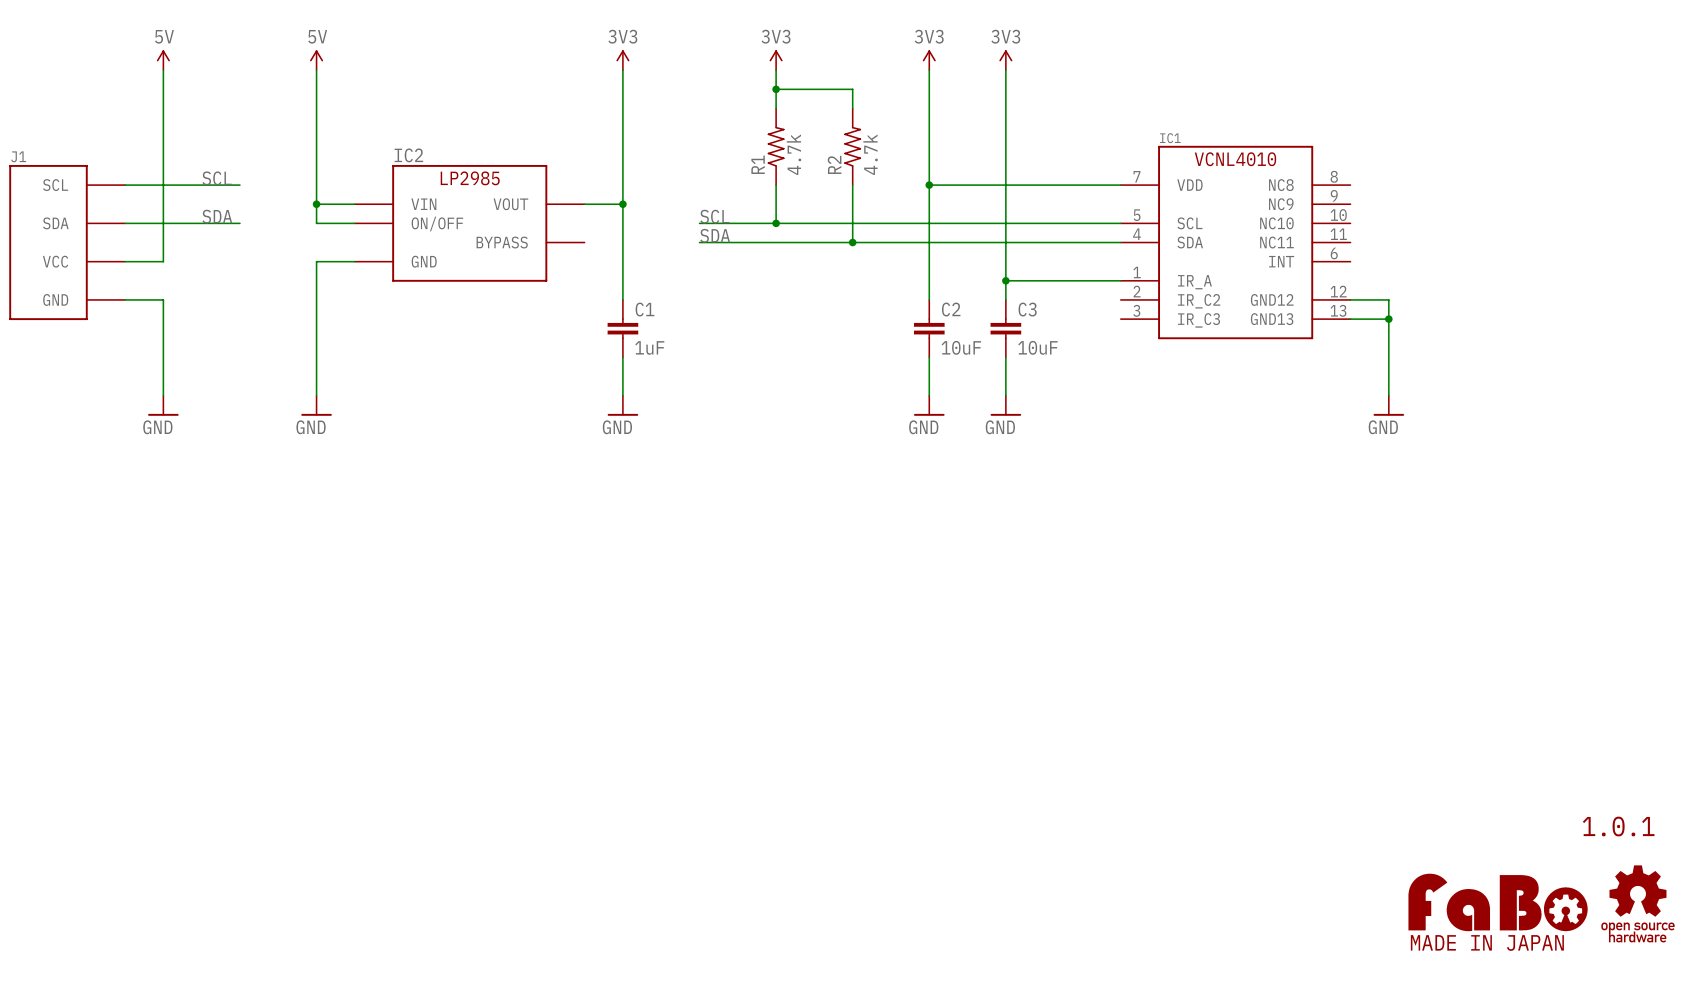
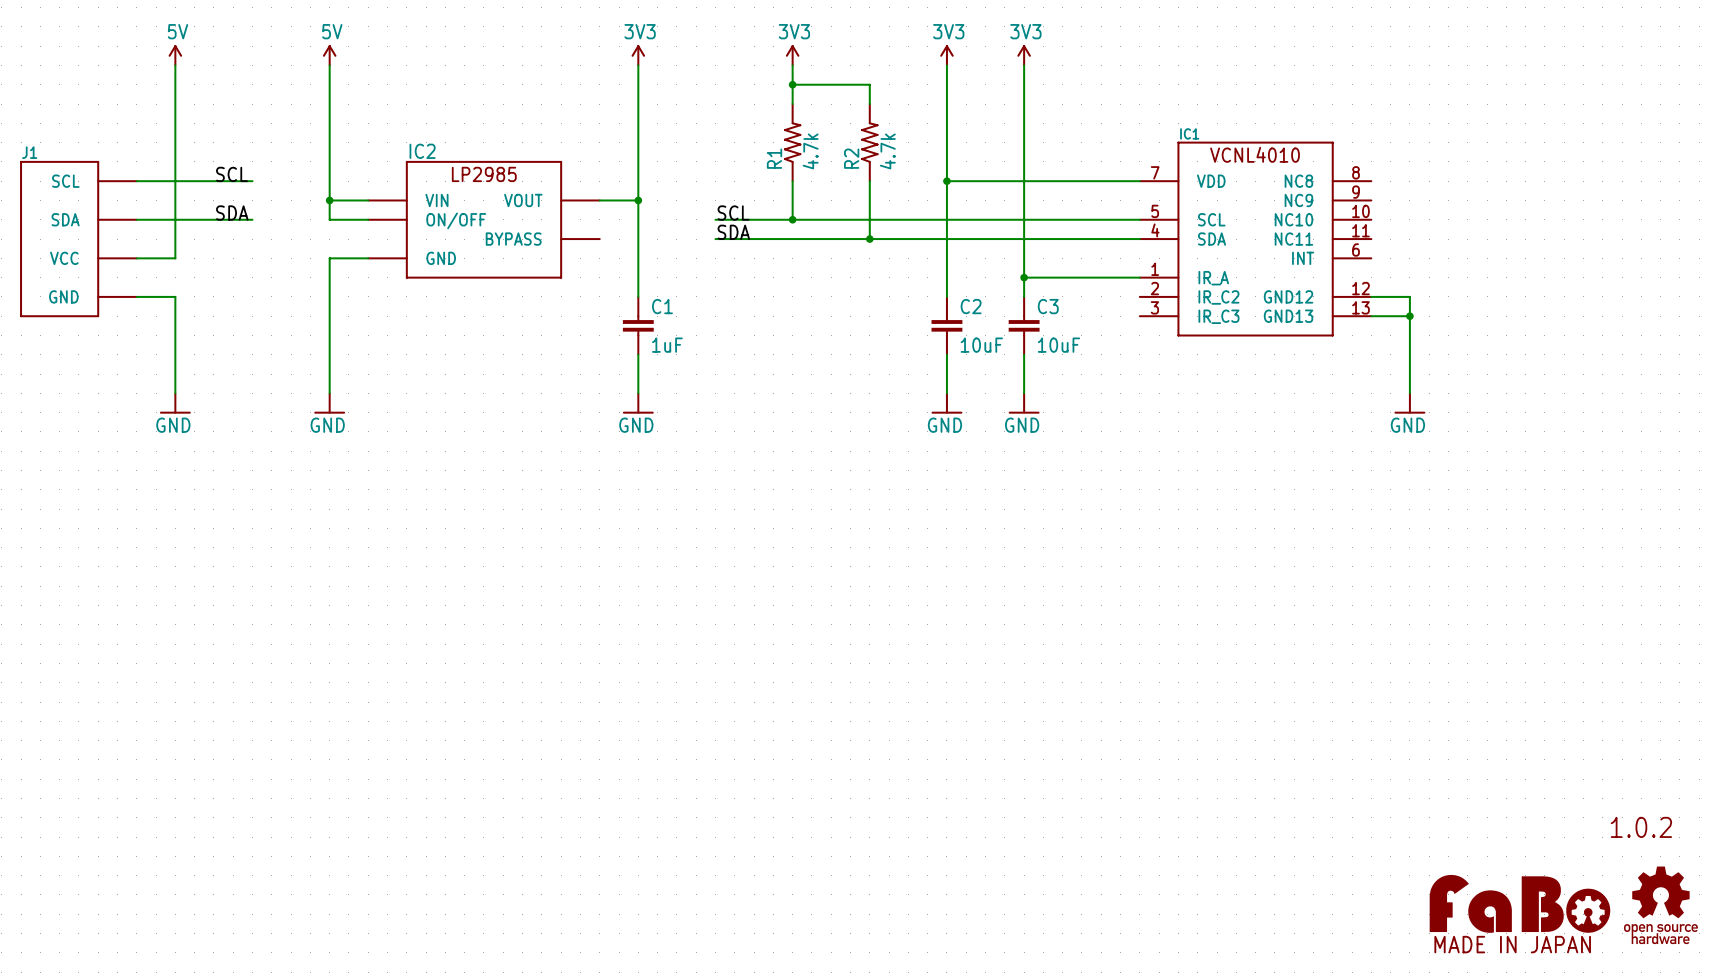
text: 1.0.1 (1618, 826) -> 1.0.2 (1641, 827)

